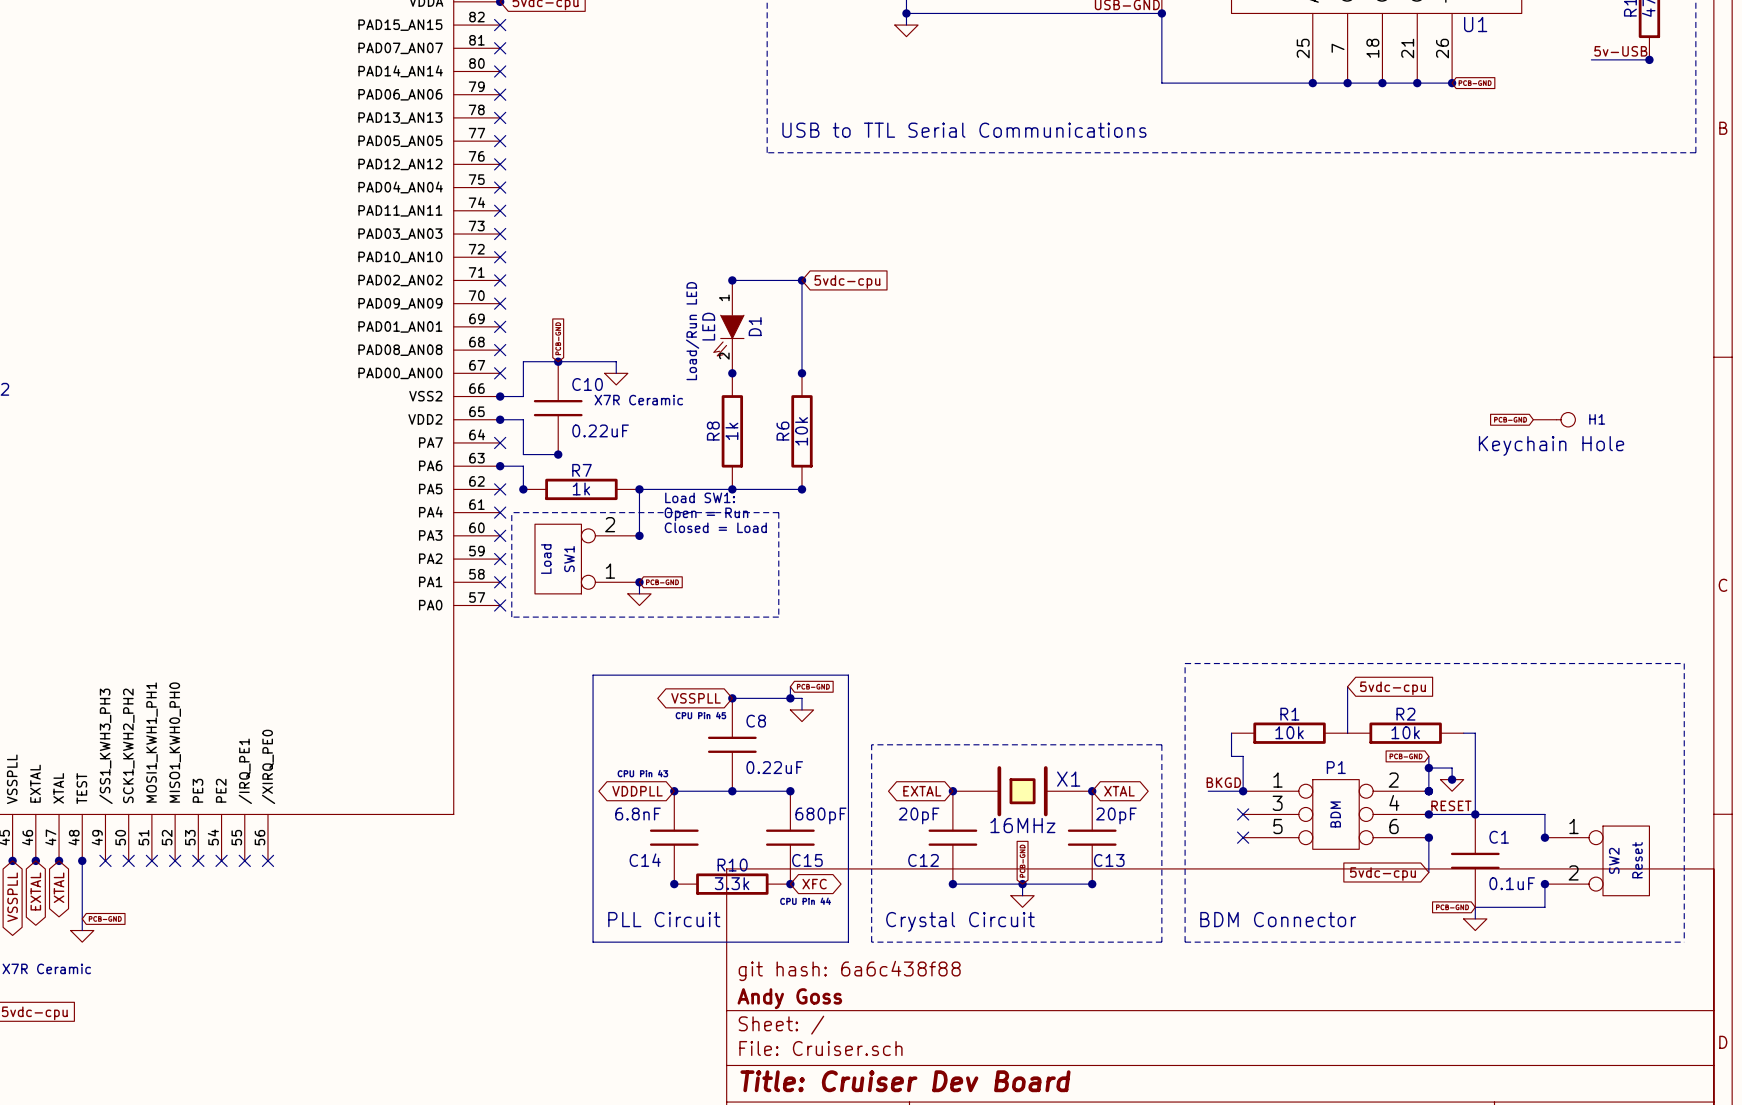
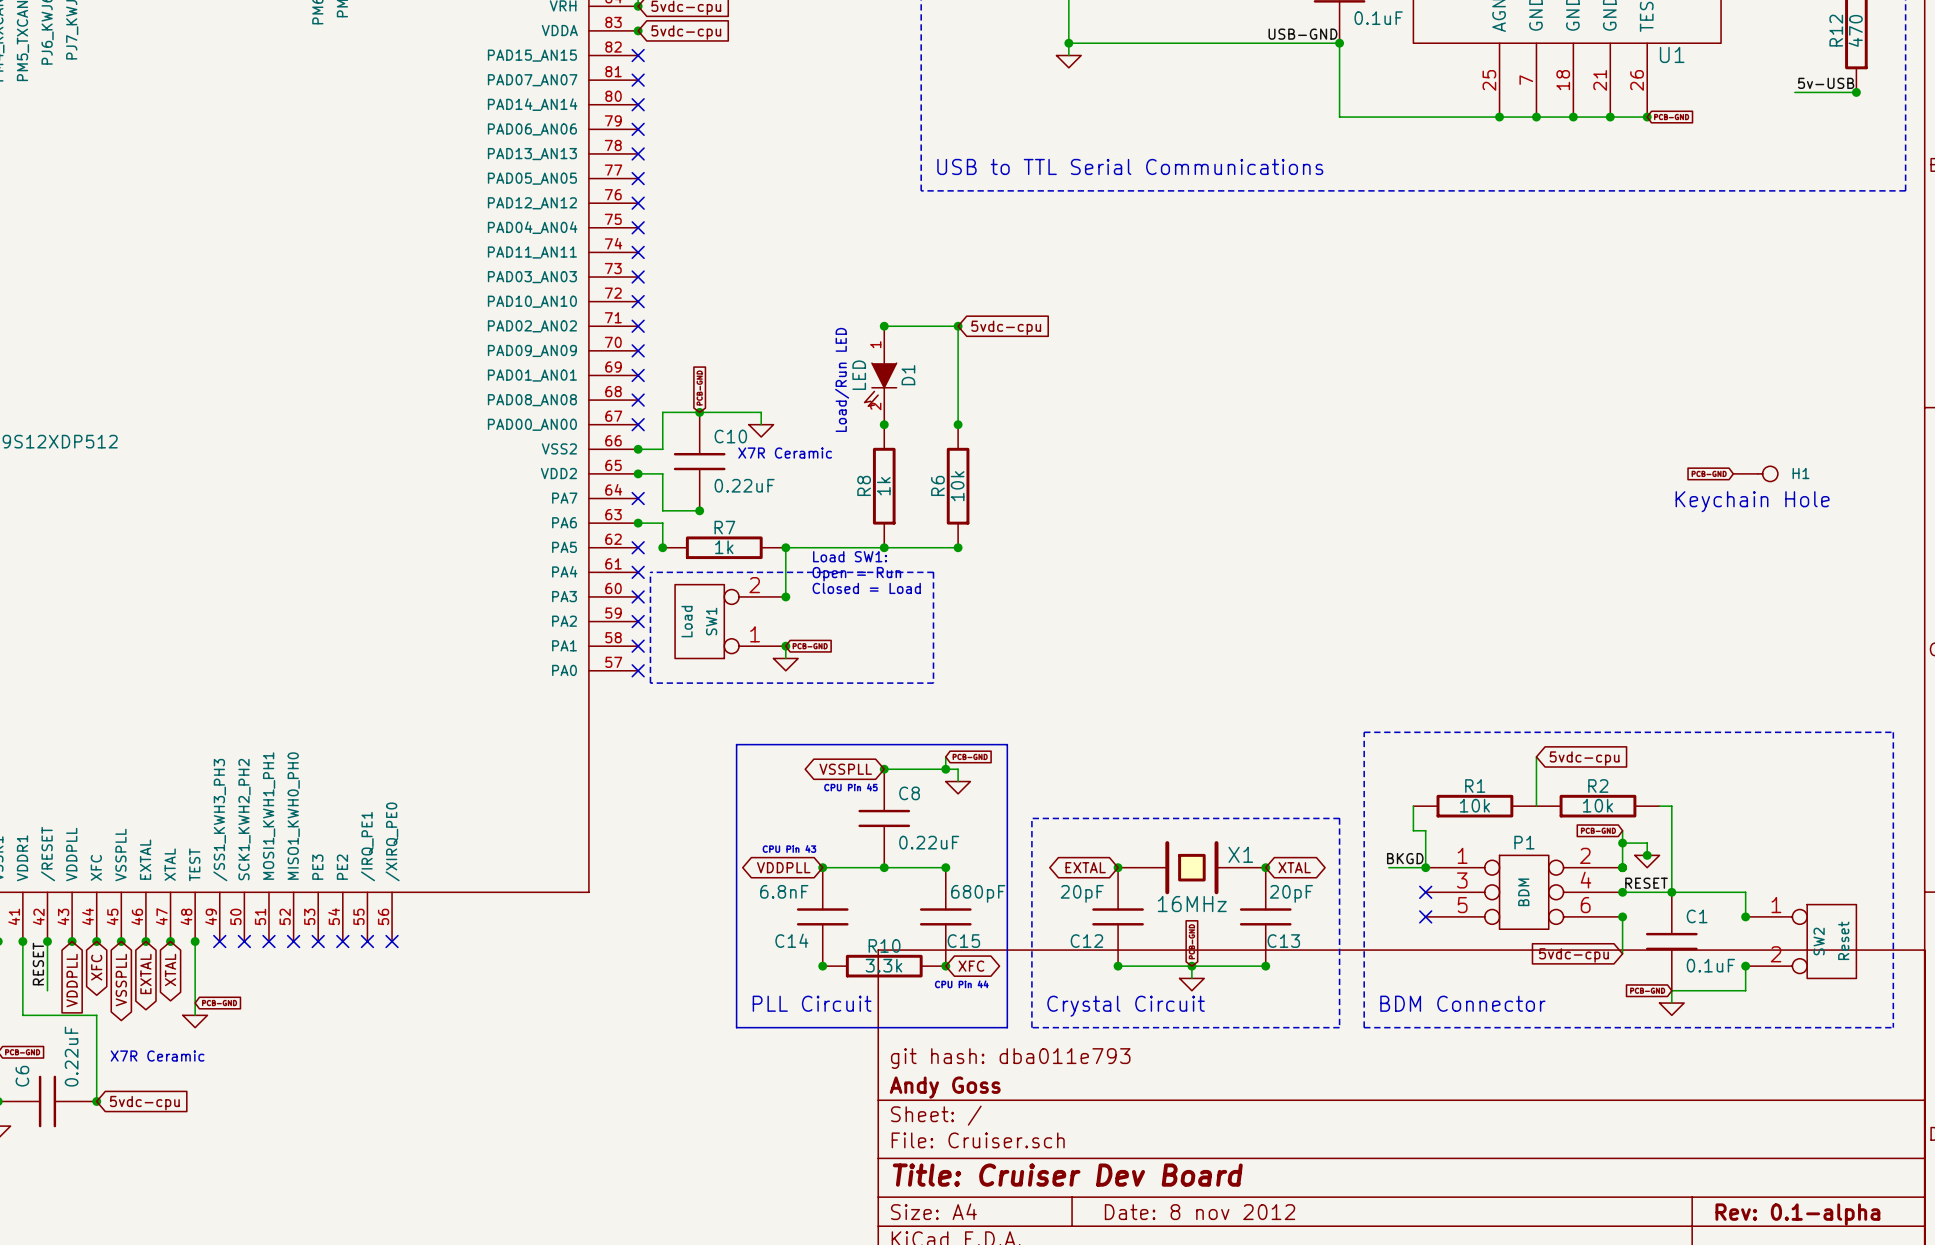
title block: git hash: 6a6c438f88 (849, 970) -> git hash: dba011e793 (1010, 1058)

